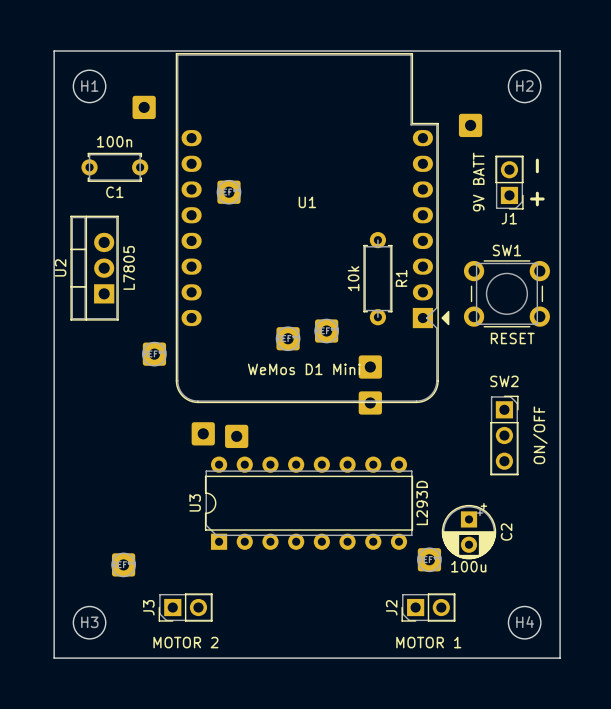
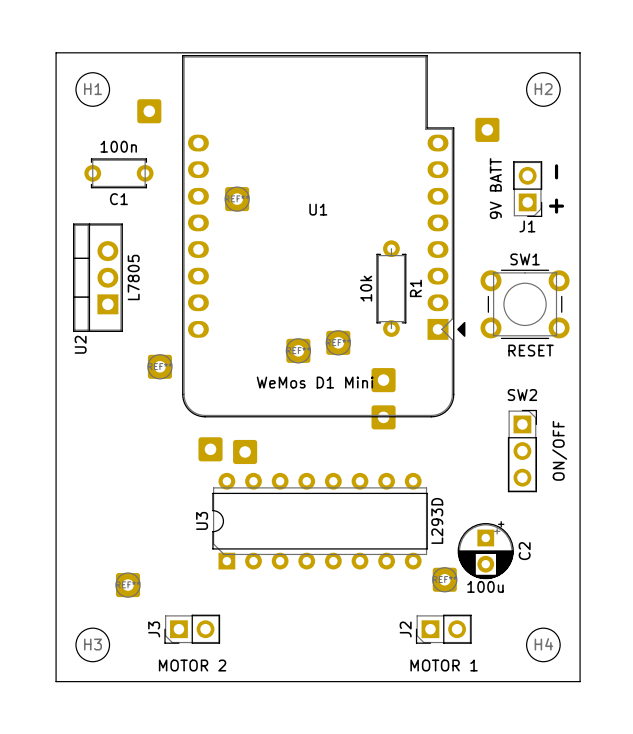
U2 name position: U2 (60, 267) -> U2 (80, 344)

